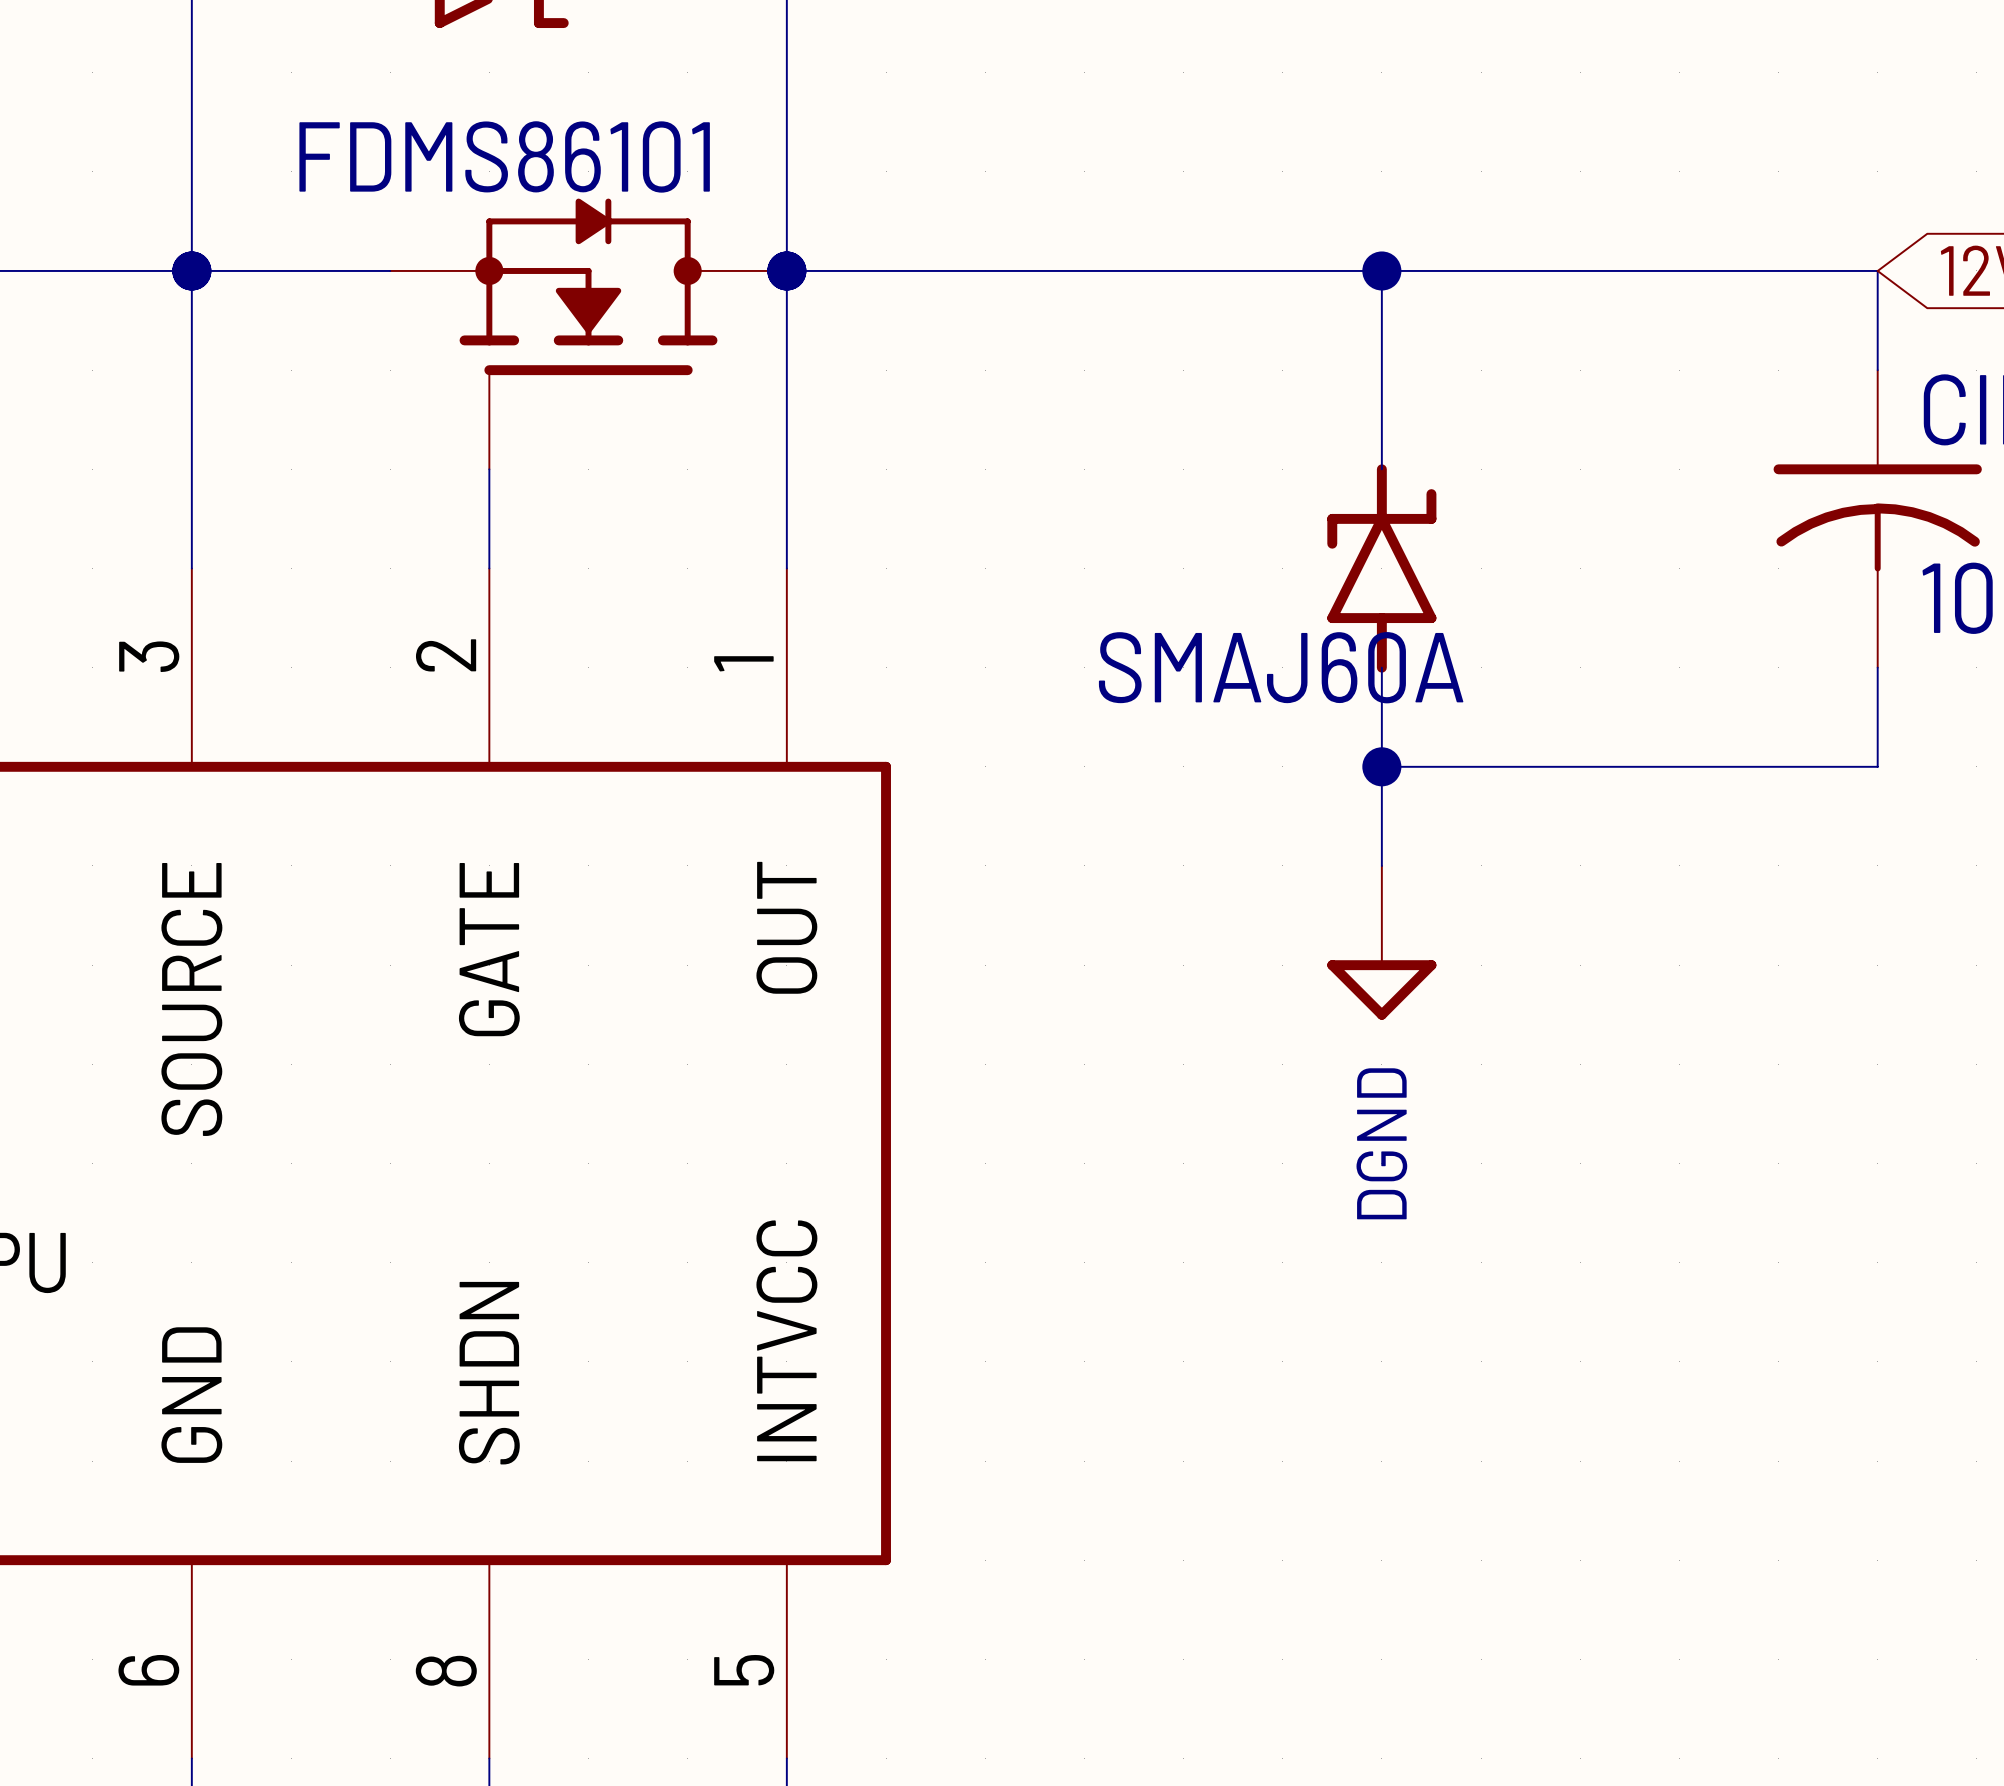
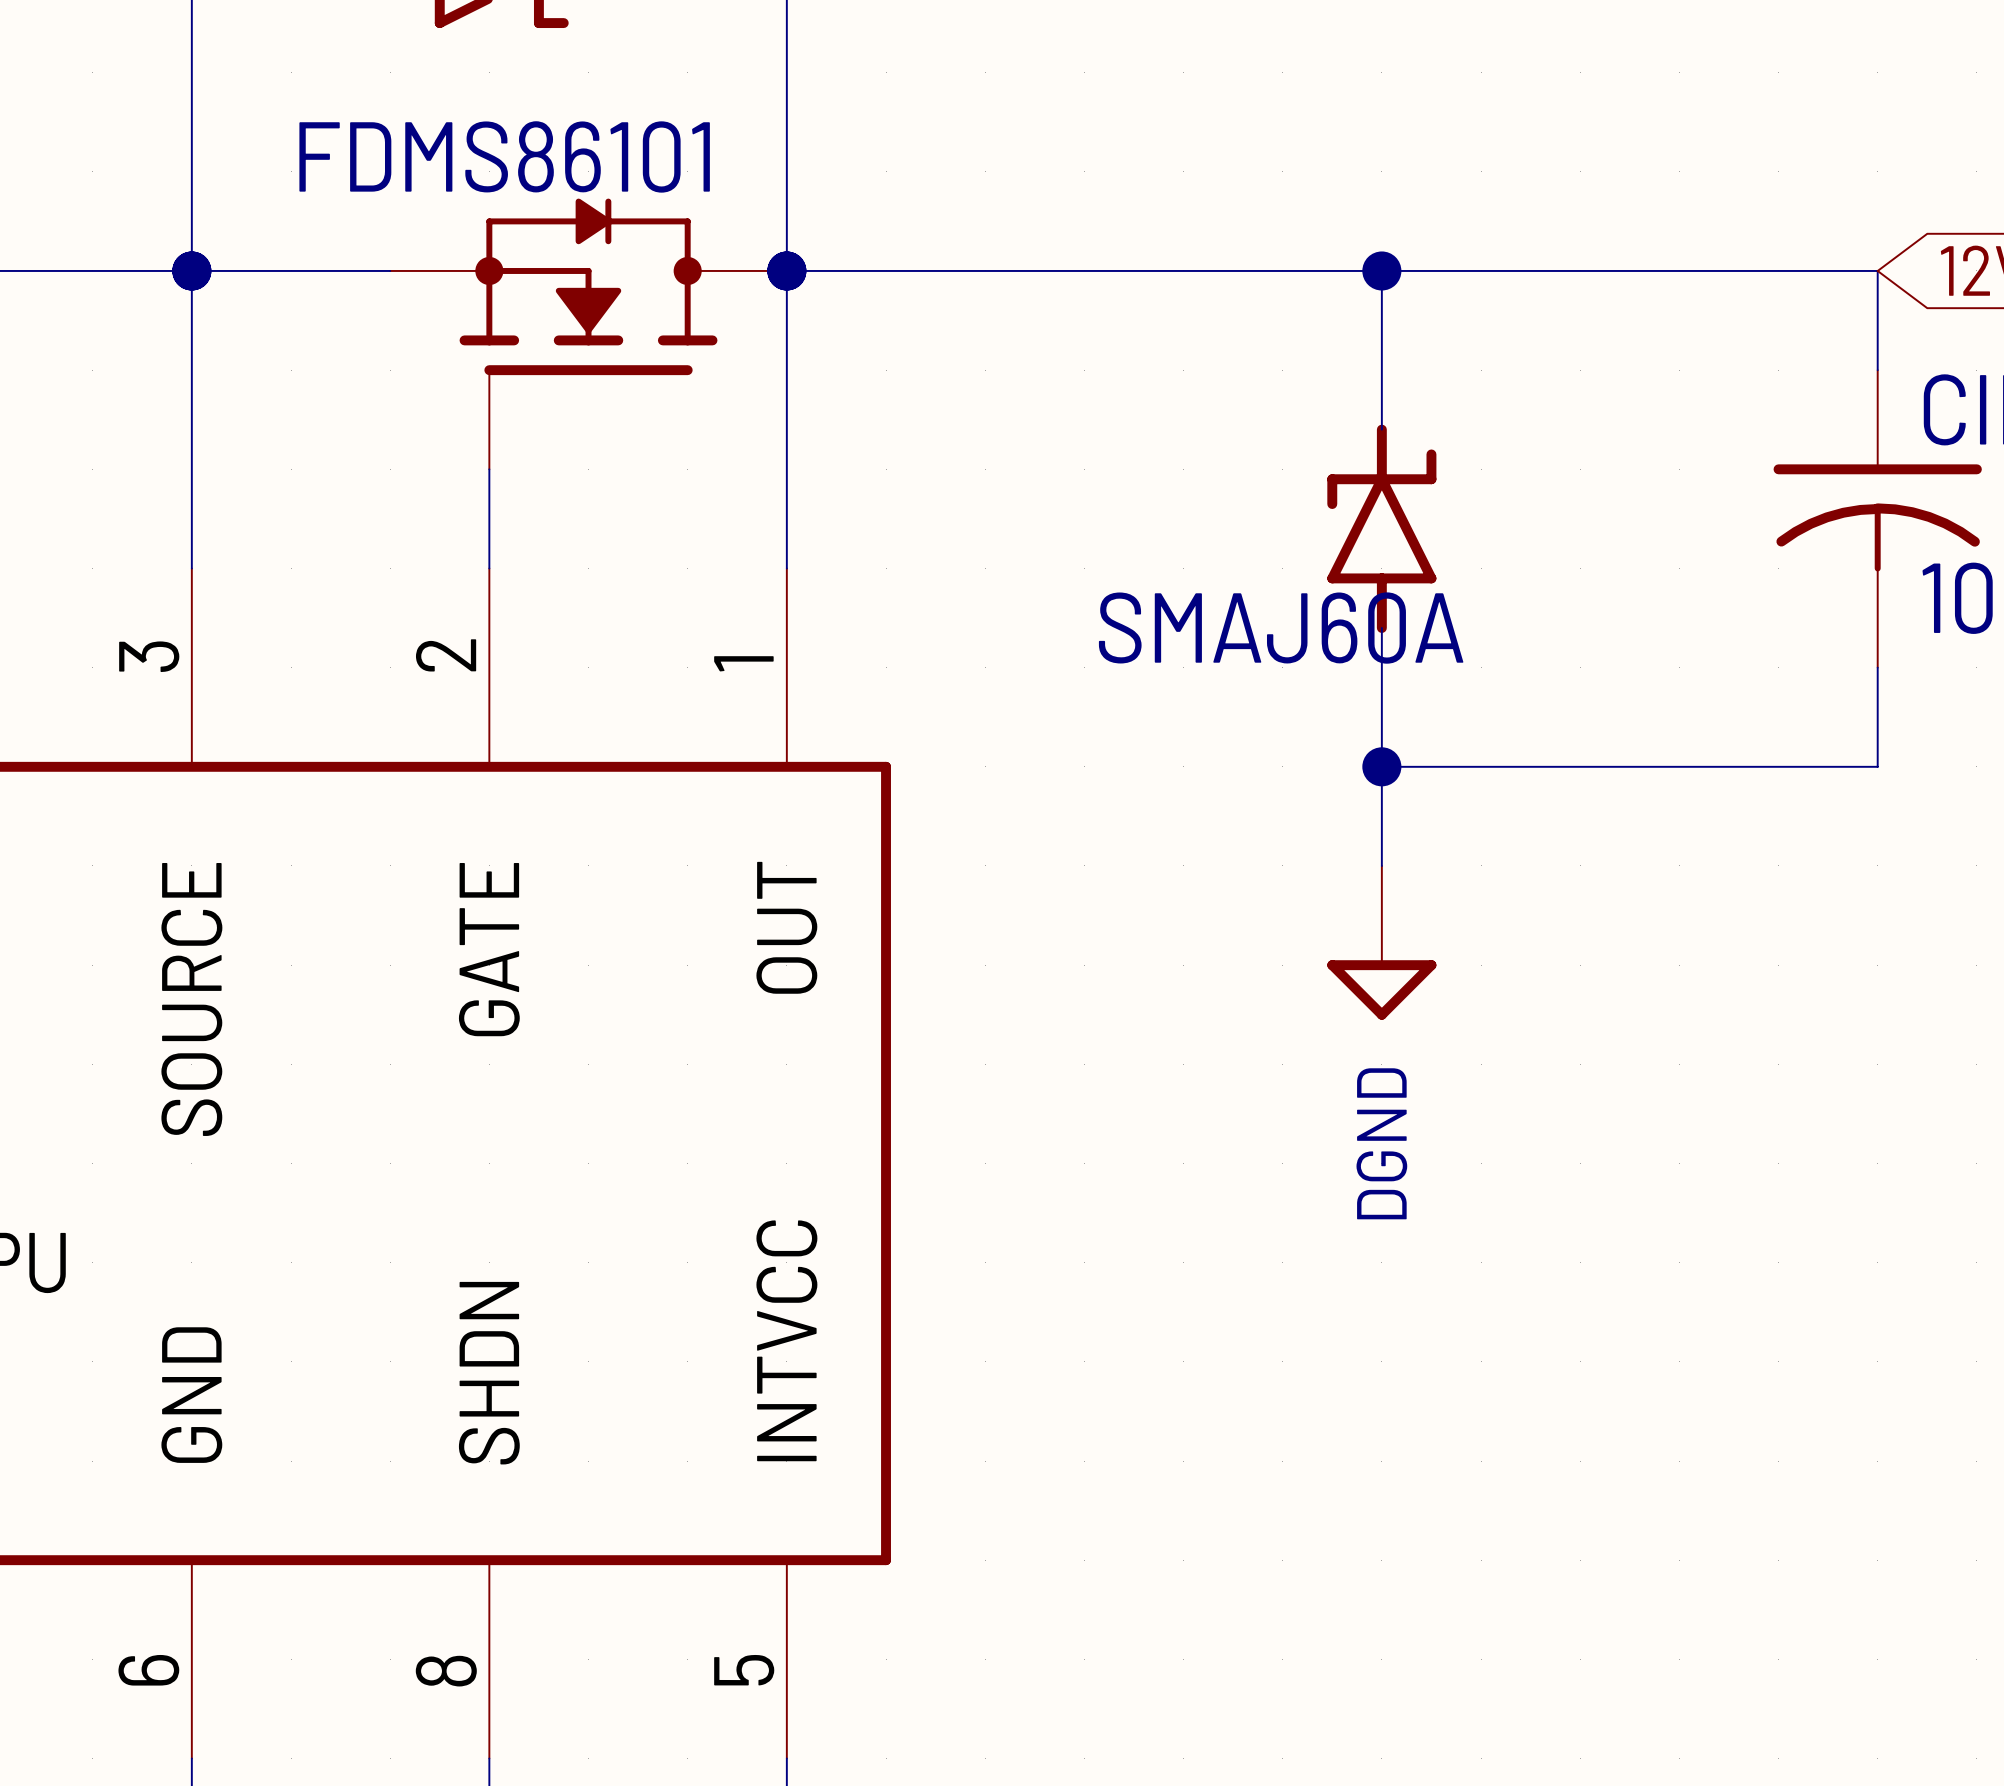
part position: (1381, 568) -> (1381, 528)

